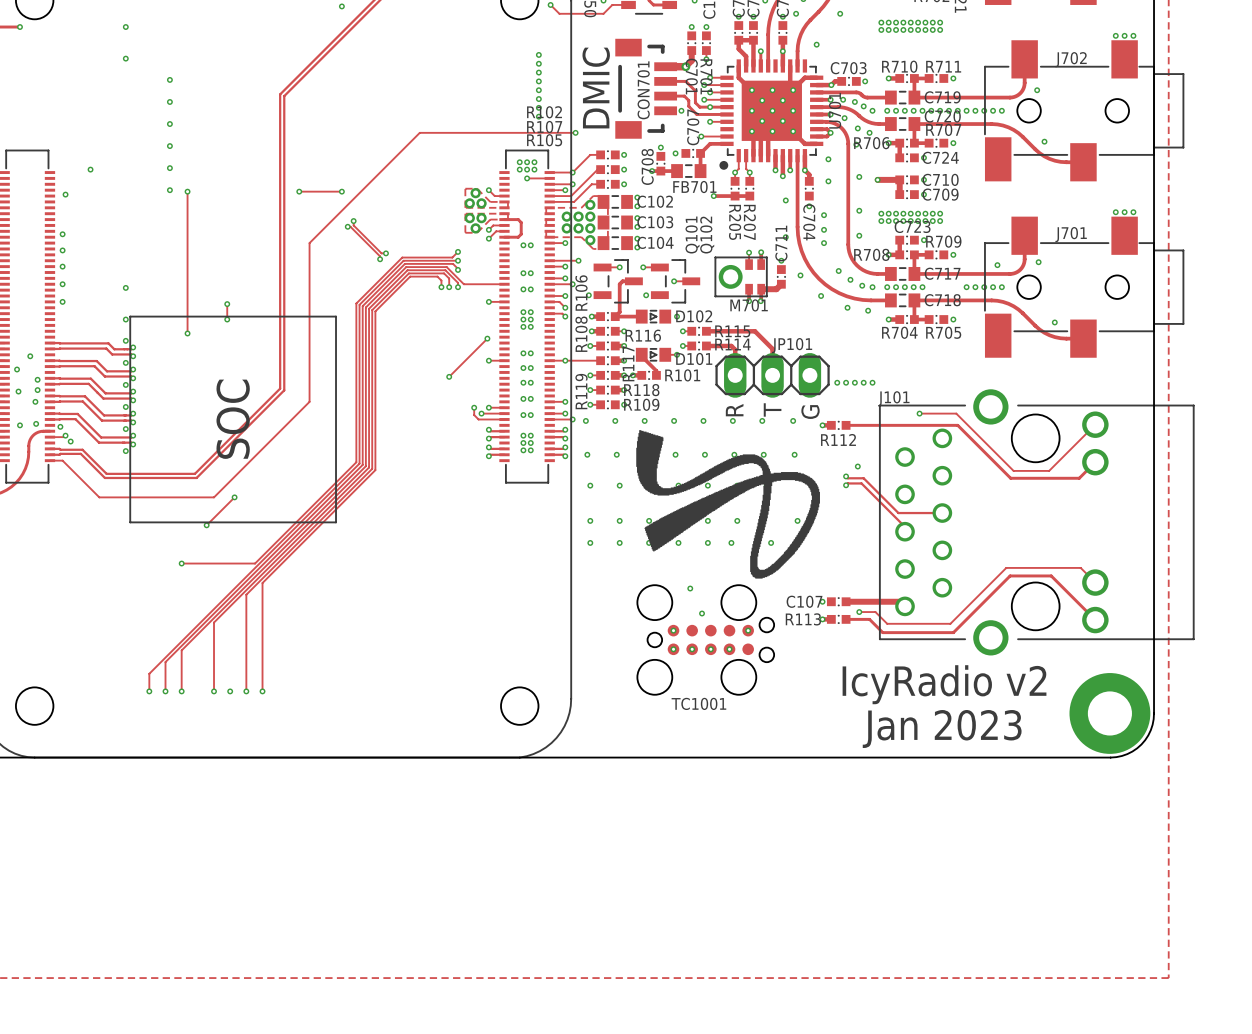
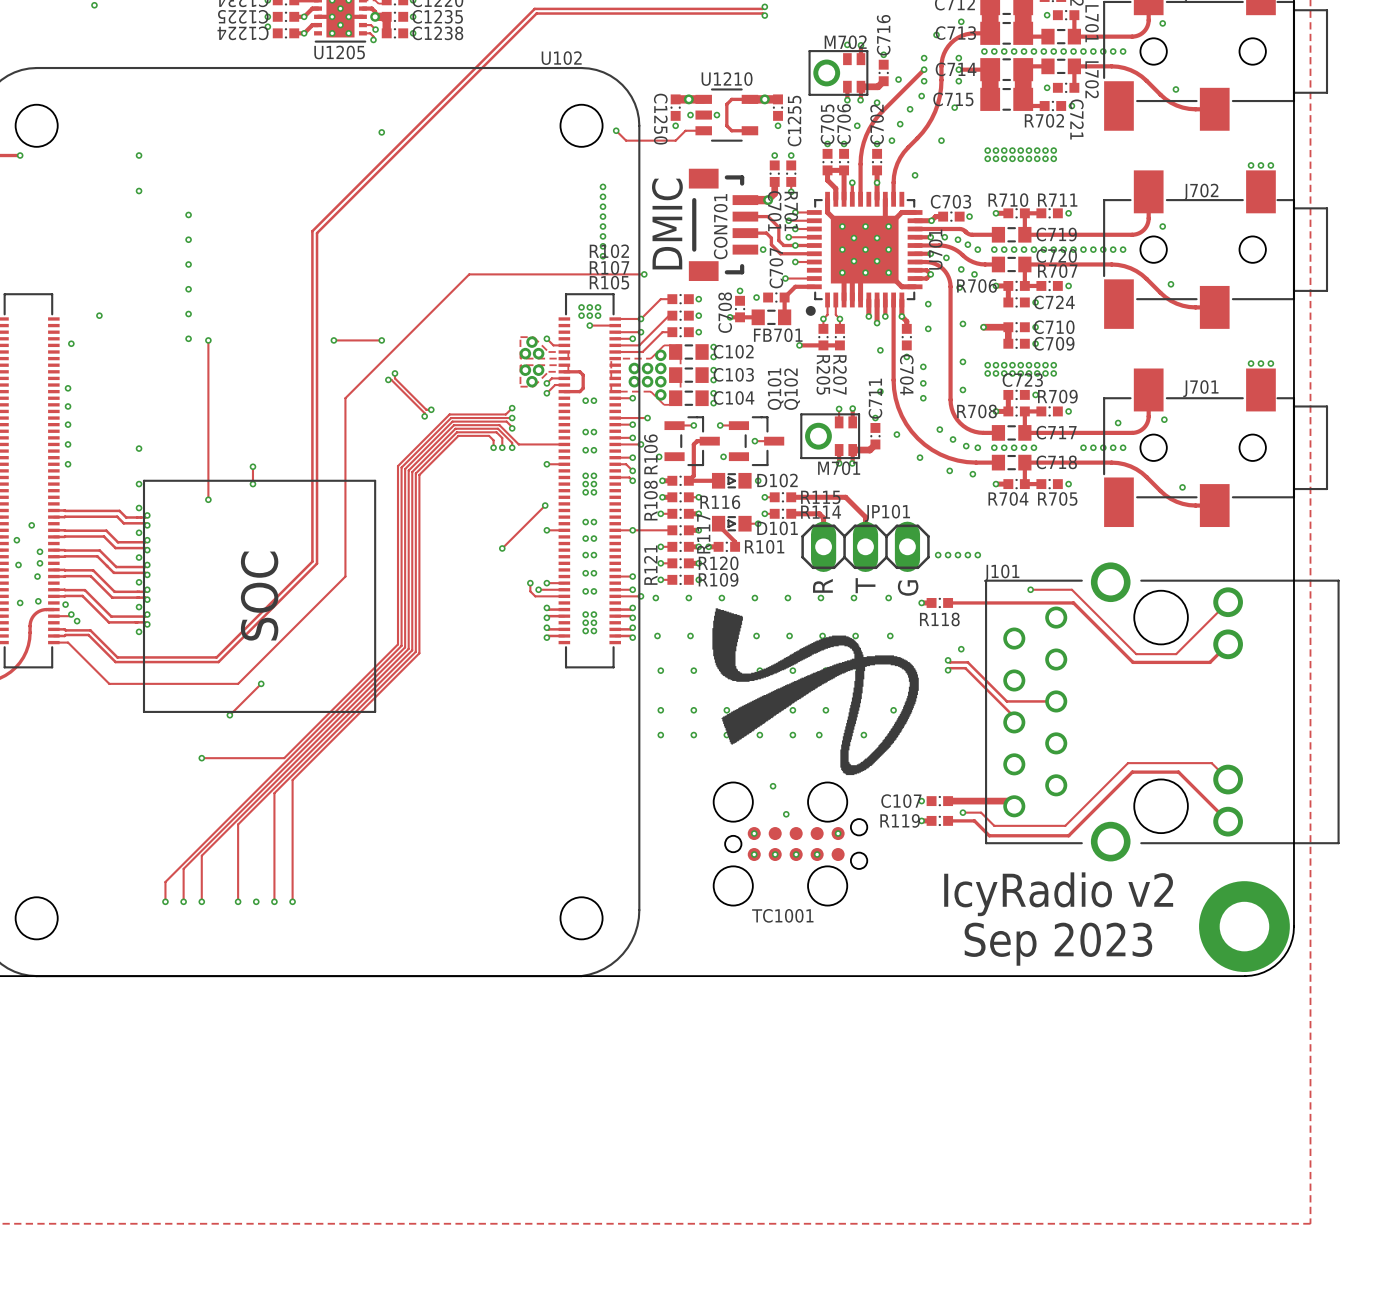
R118 name: R118 (641, 390) -> R120 (718, 563)
R119 name: R119 (581, 391) -> R121 (650, 565)
R112 name: R112 (838, 439) -> R118 (939, 619)
R113 name: R113 (803, 619) -> R119 (900, 820)
text: Jan 2023 (942, 728) -> Sep 2023 (1058, 944)

